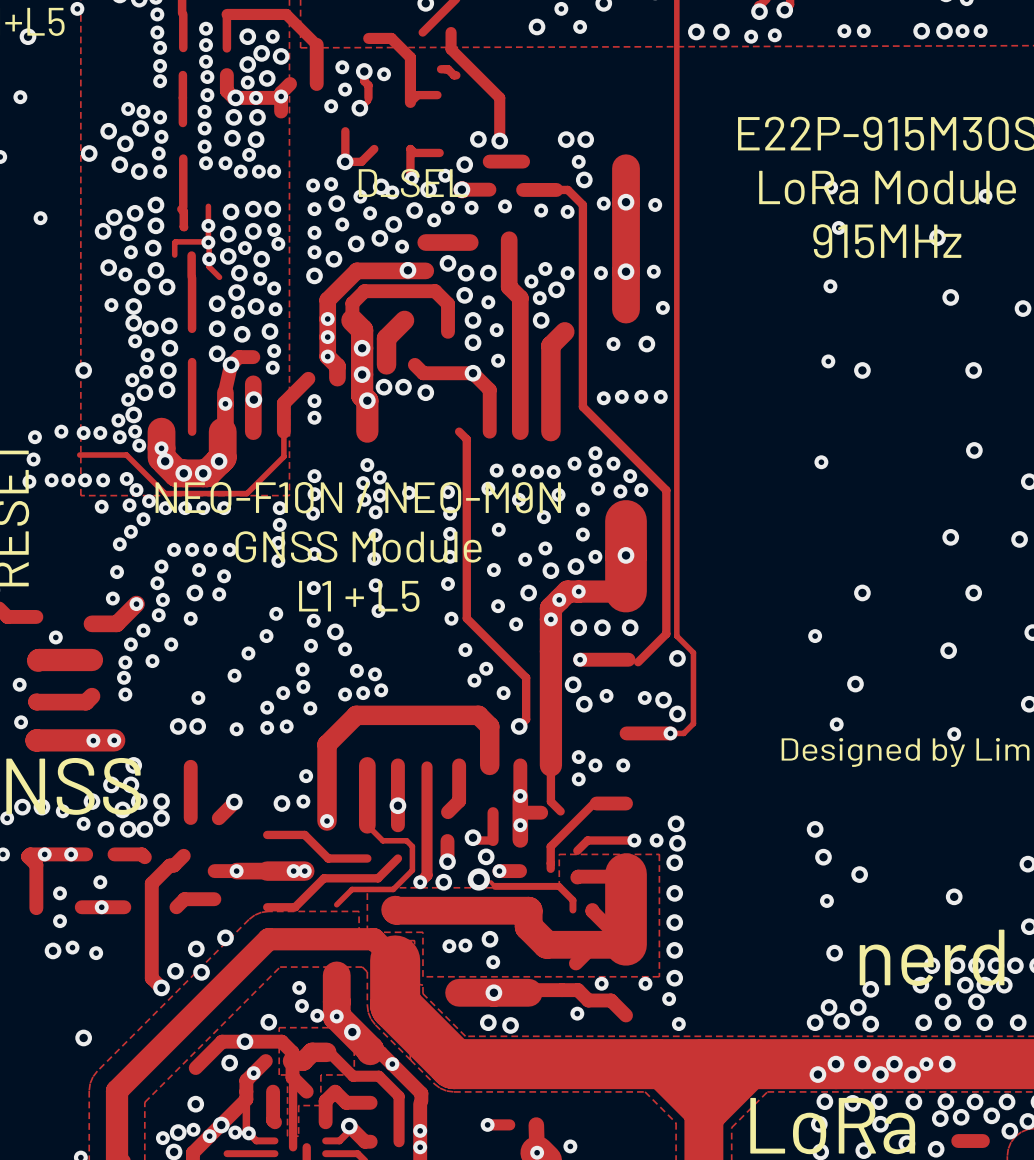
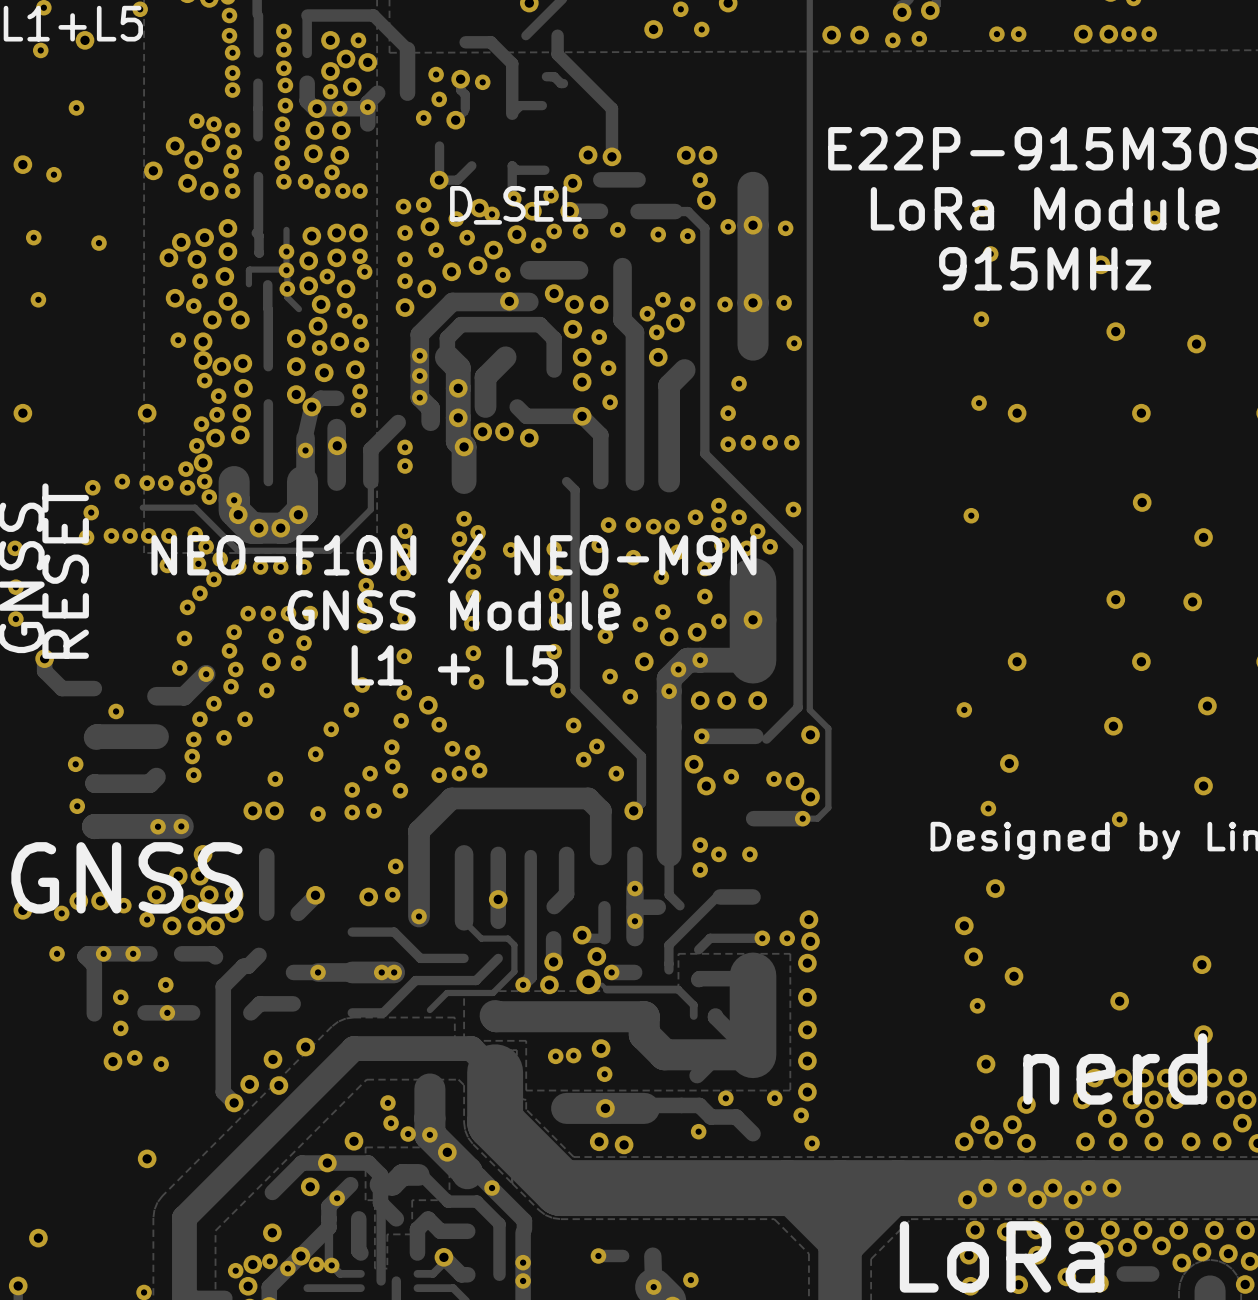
via: (646, 344) -> none
via: none -> (728, 413)
via: none -> (793, 509)
via: none -> (995, 888)

